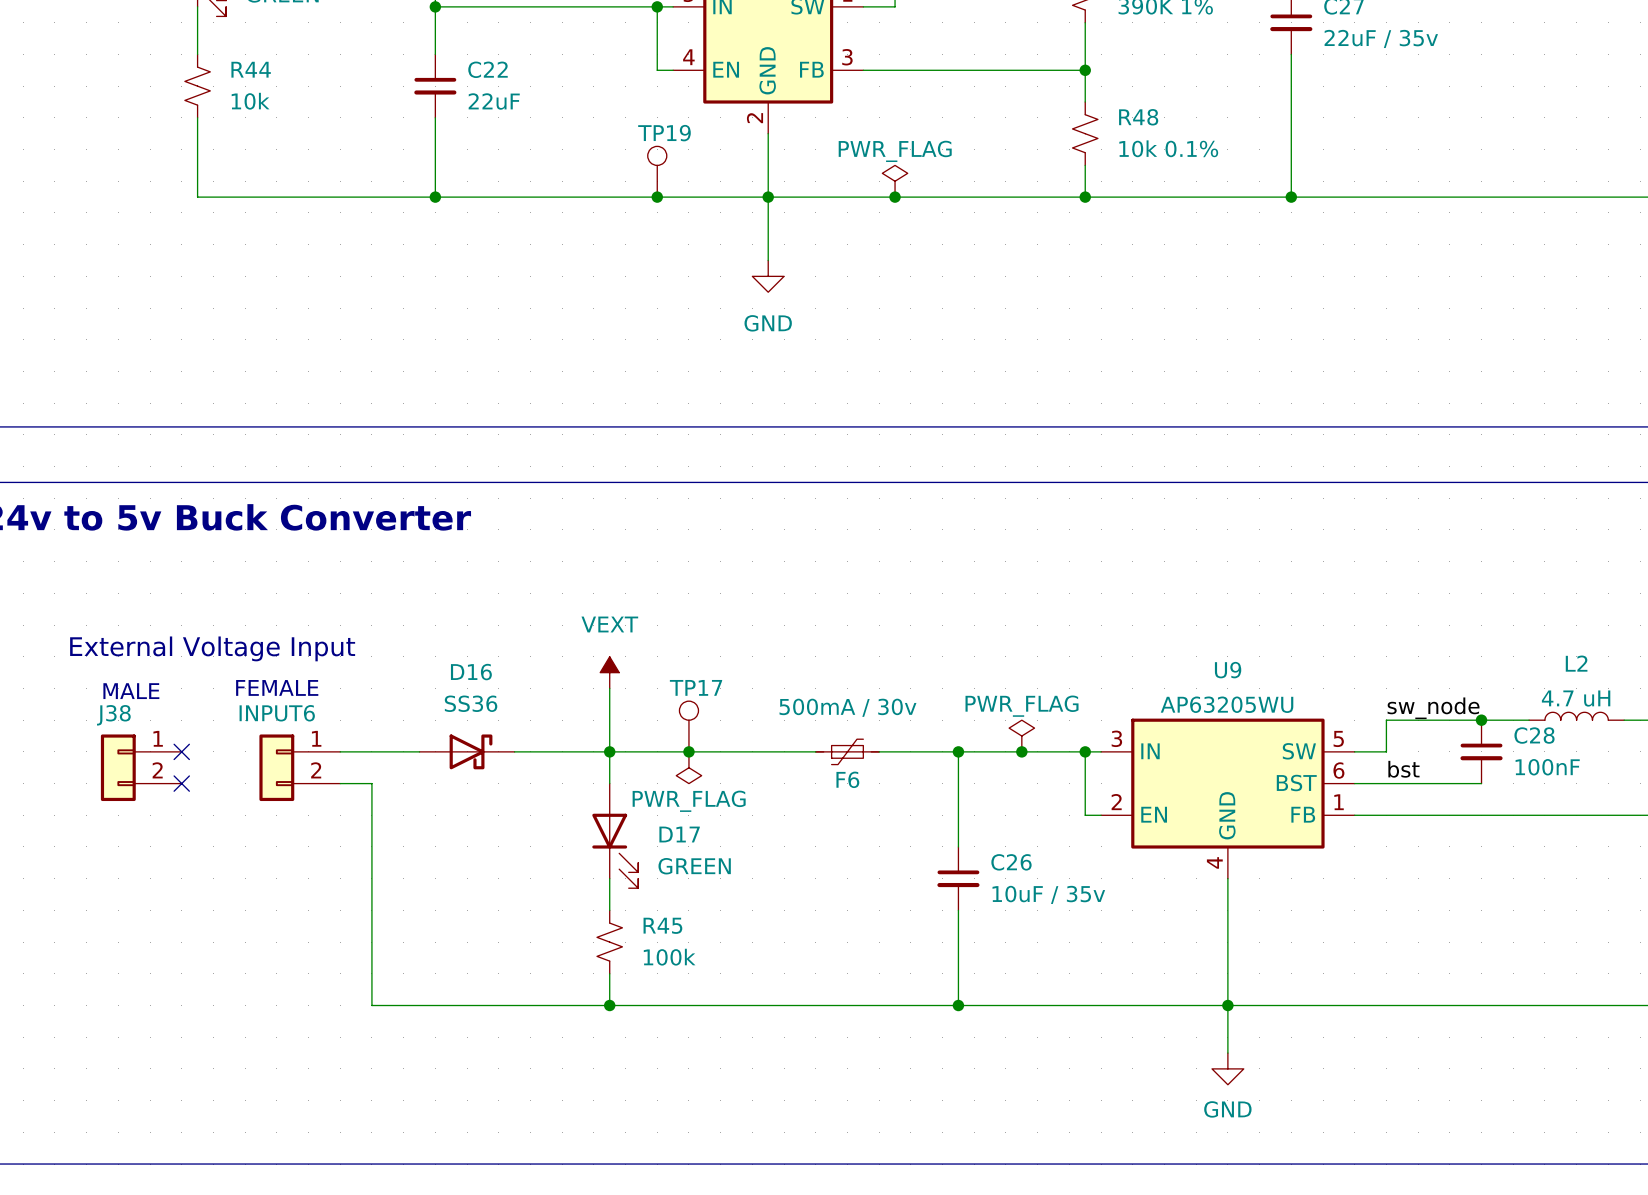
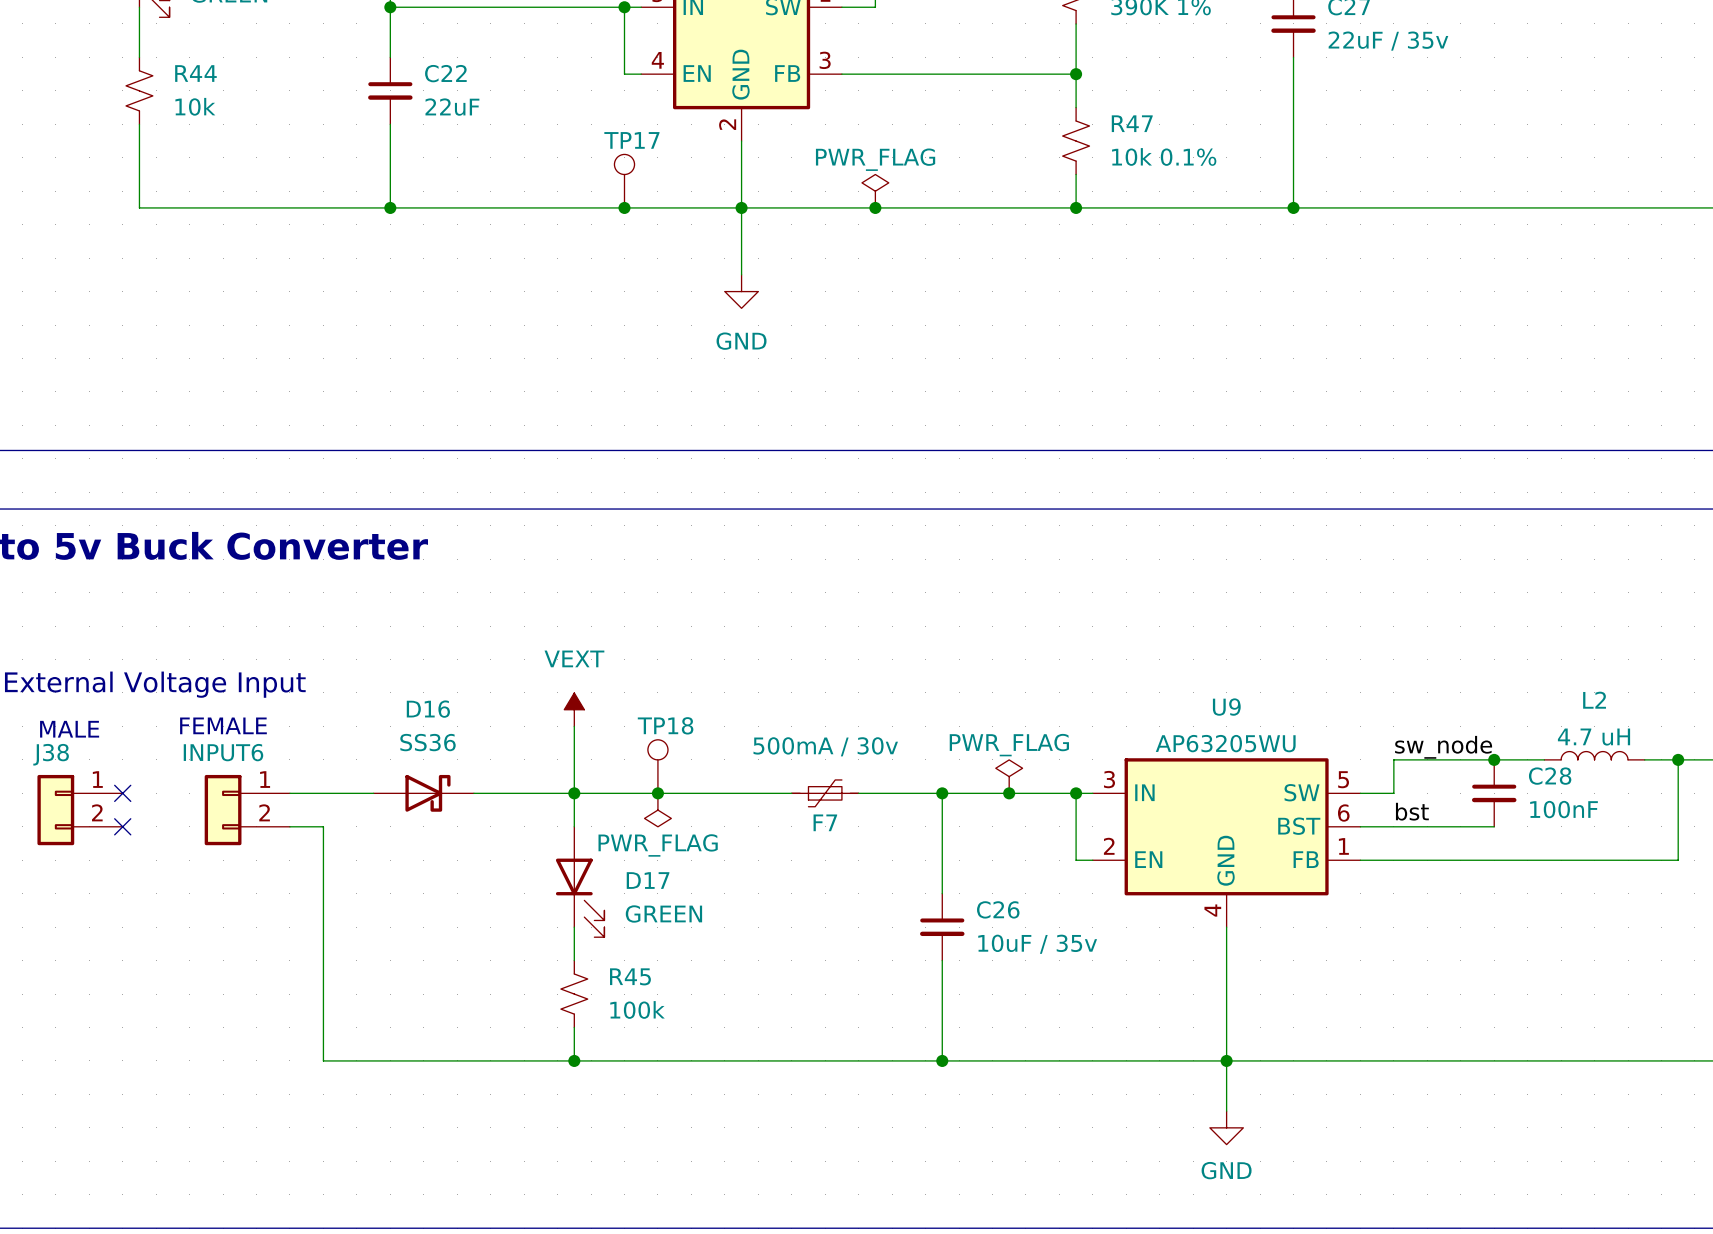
R48 name: R48 (1138, 117) -> R47 (1132, 123)
TP19 name: TP19 (664, 133) -> TP17 (631, 140)
TP17 name: TP17 (696, 687) -> TP18 (665, 725)
F6 name: F6 (847, 779) -> F7 (825, 822)

